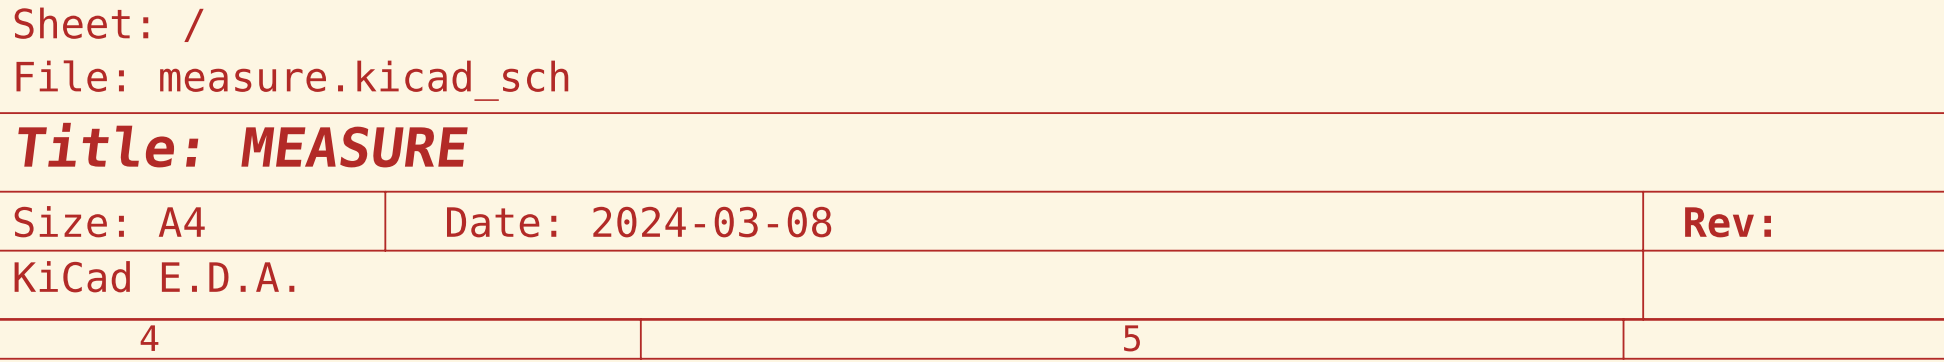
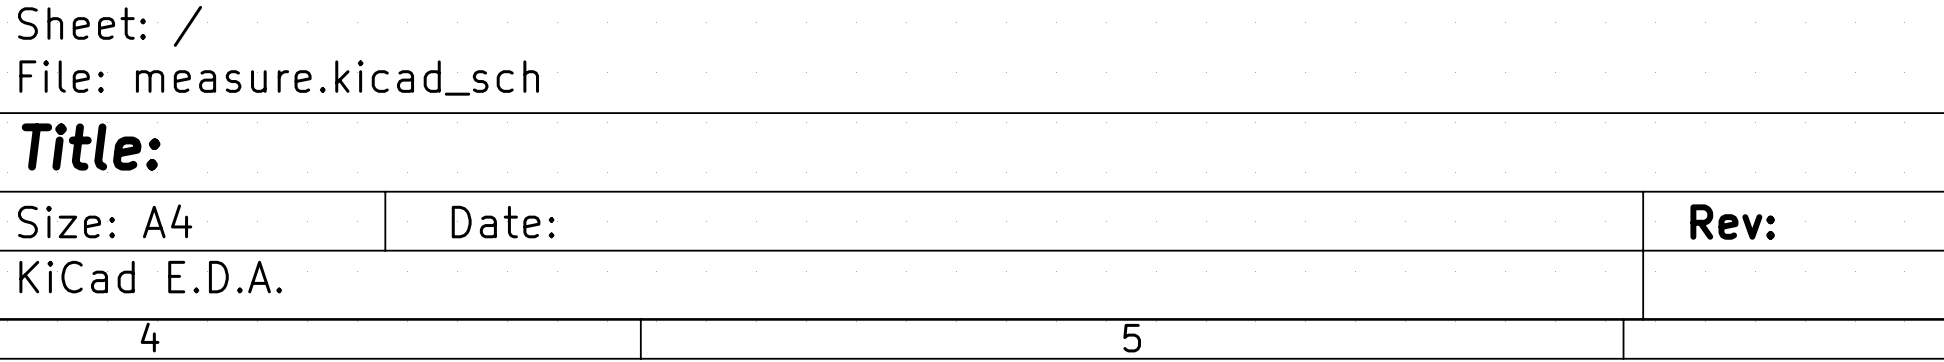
title block: Title: MEASURE (243, 145) -> Title: (91, 147)
title block: Date: 2024-03-08 (639, 222) -> Date: (503, 222)

